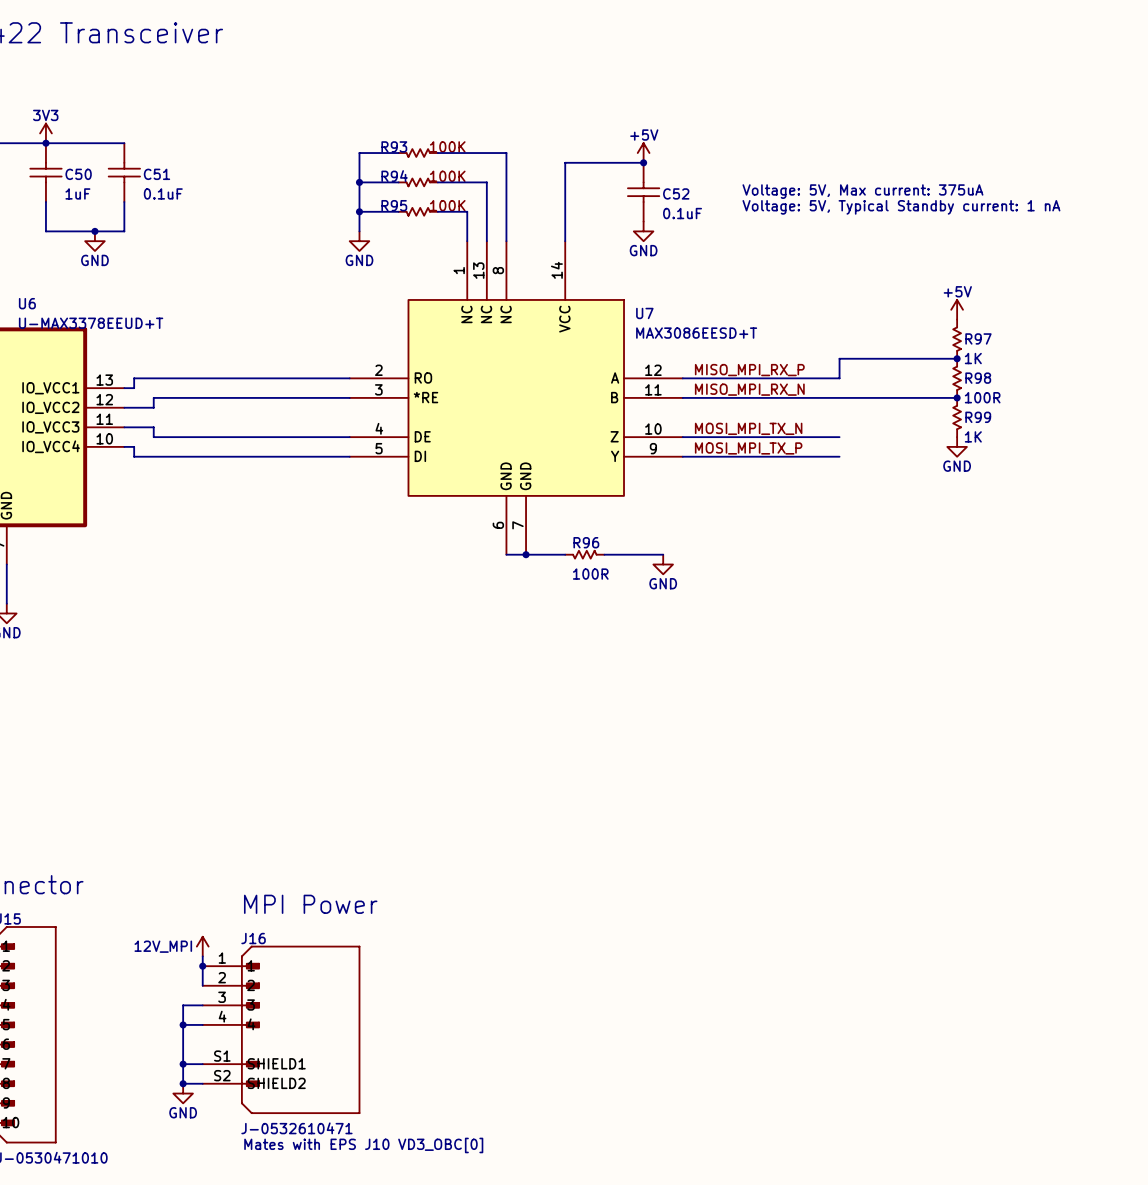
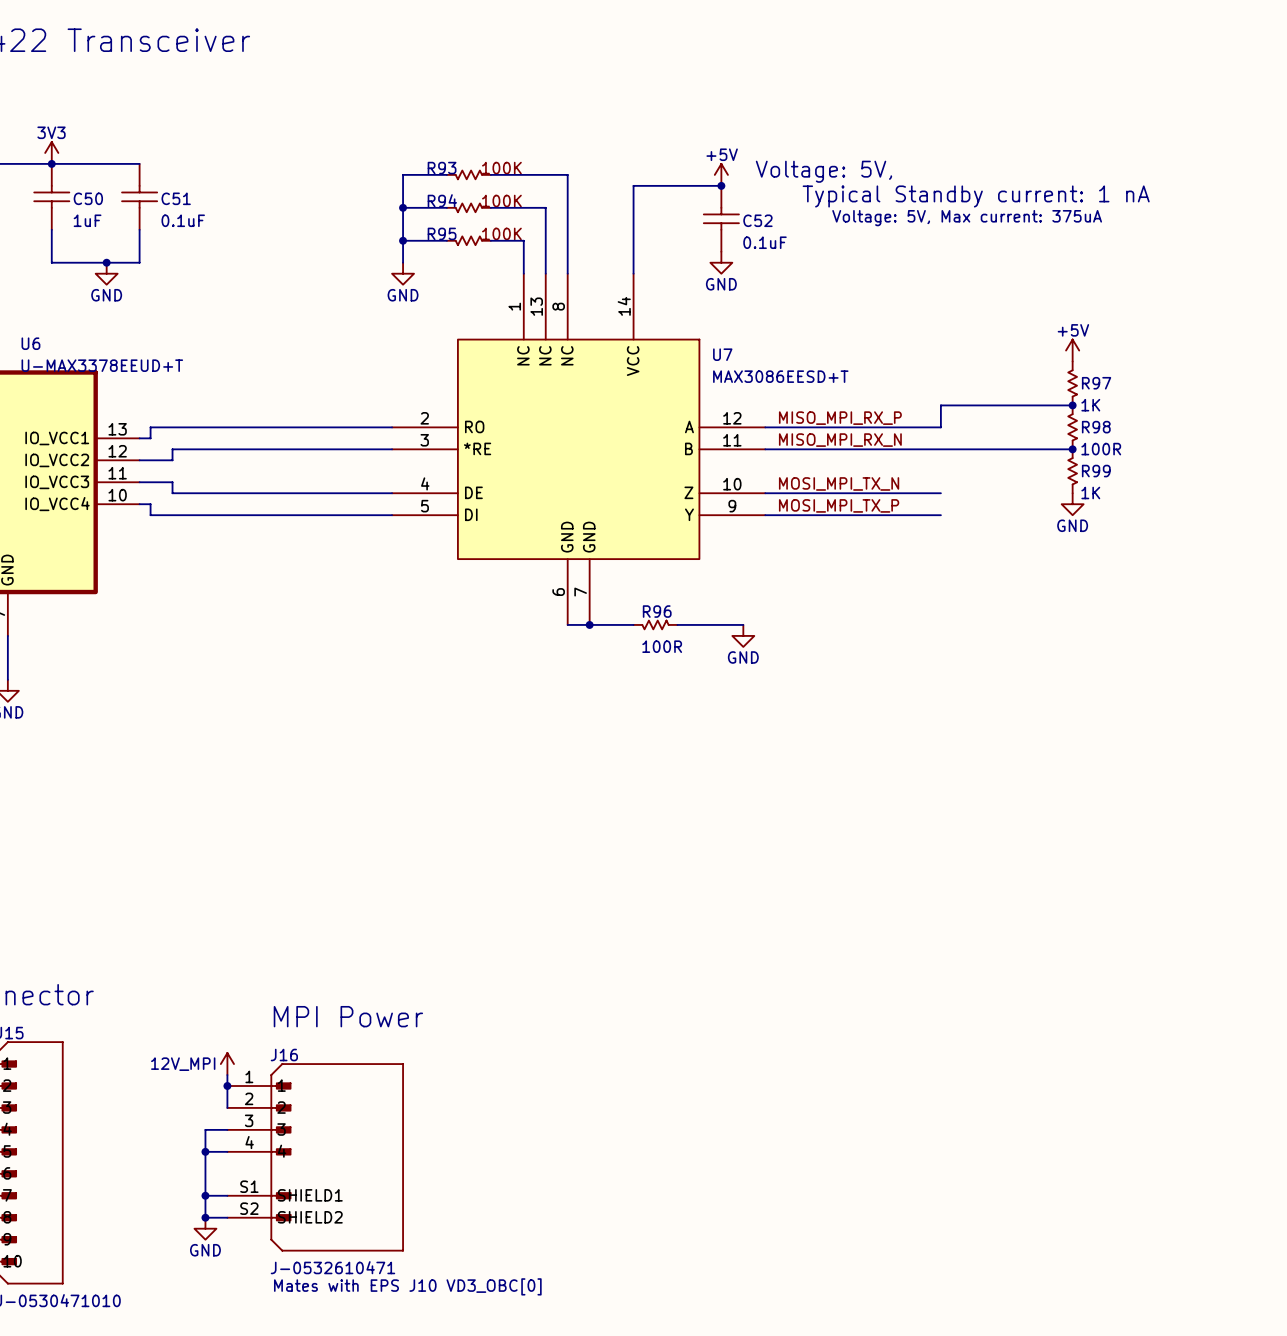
text: none -> Voltage: 5V, (823, 171)
text: none -> Typical Standby current: 1 nA (976, 196)
text: Voltage: 5V, Typical Standby current: 1 nA (901, 207) -> none

